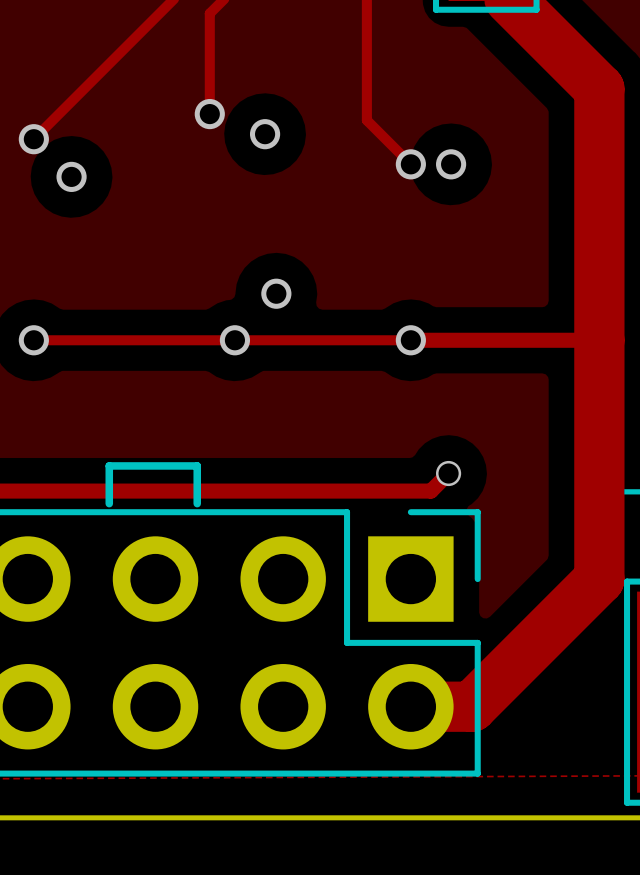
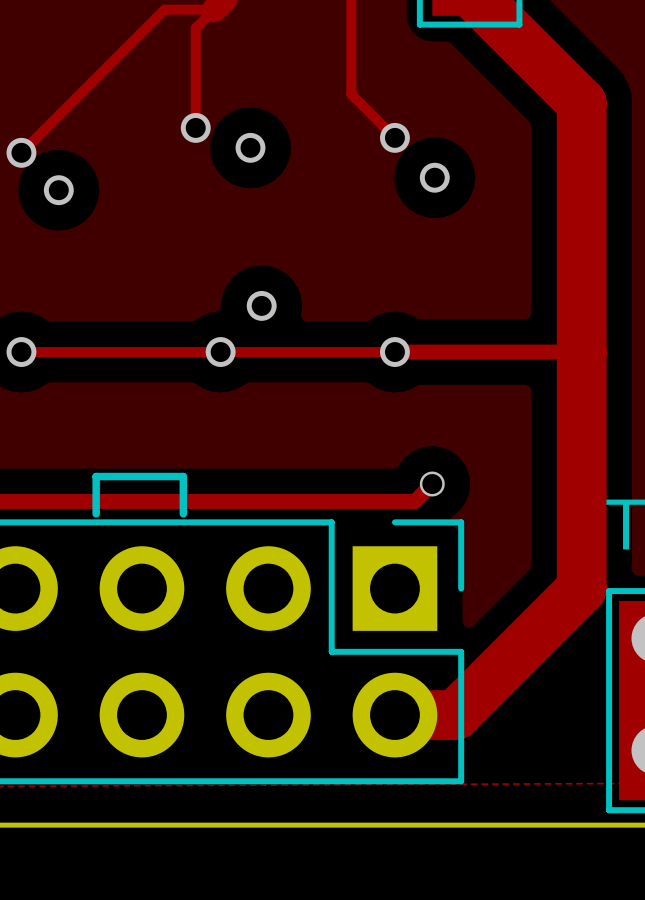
track: (366, 80) (366, 120) (410, 164) -> (351, 94) (394, 137)
via position: (410, 164) -> (394, 137)

